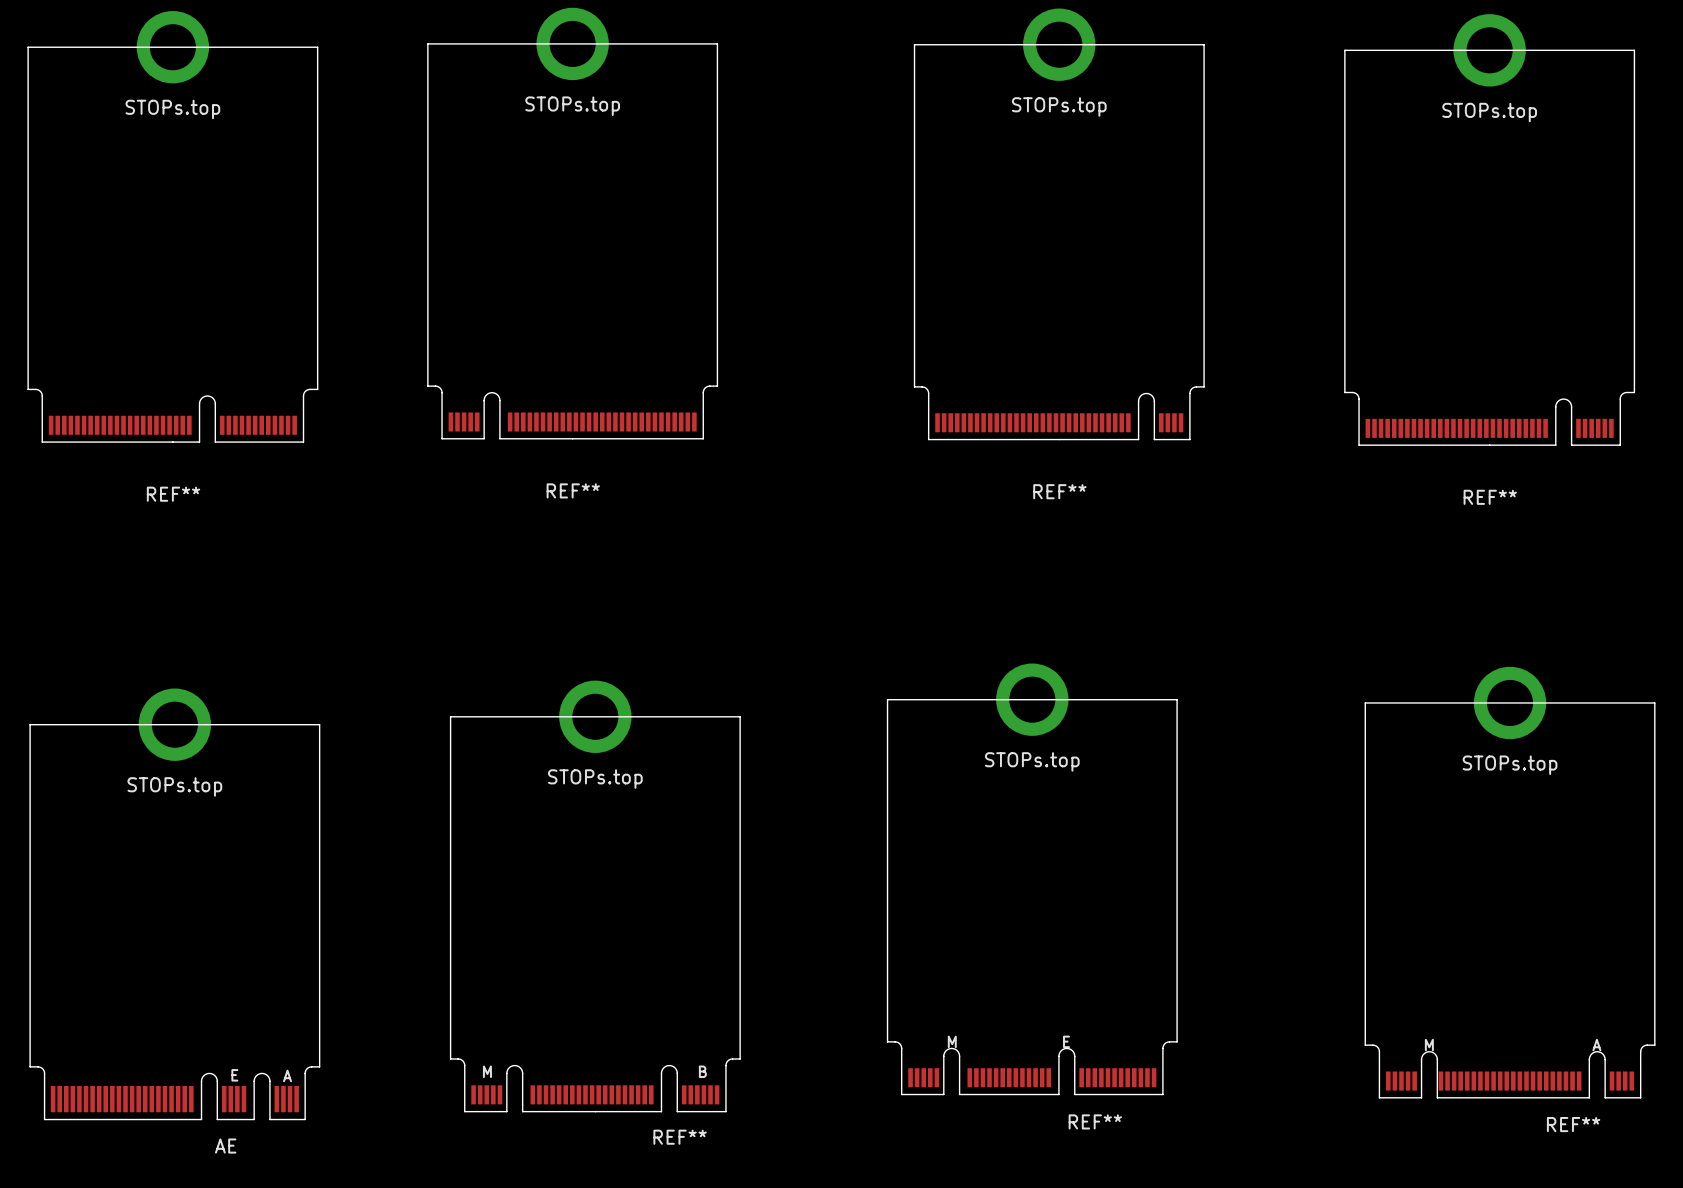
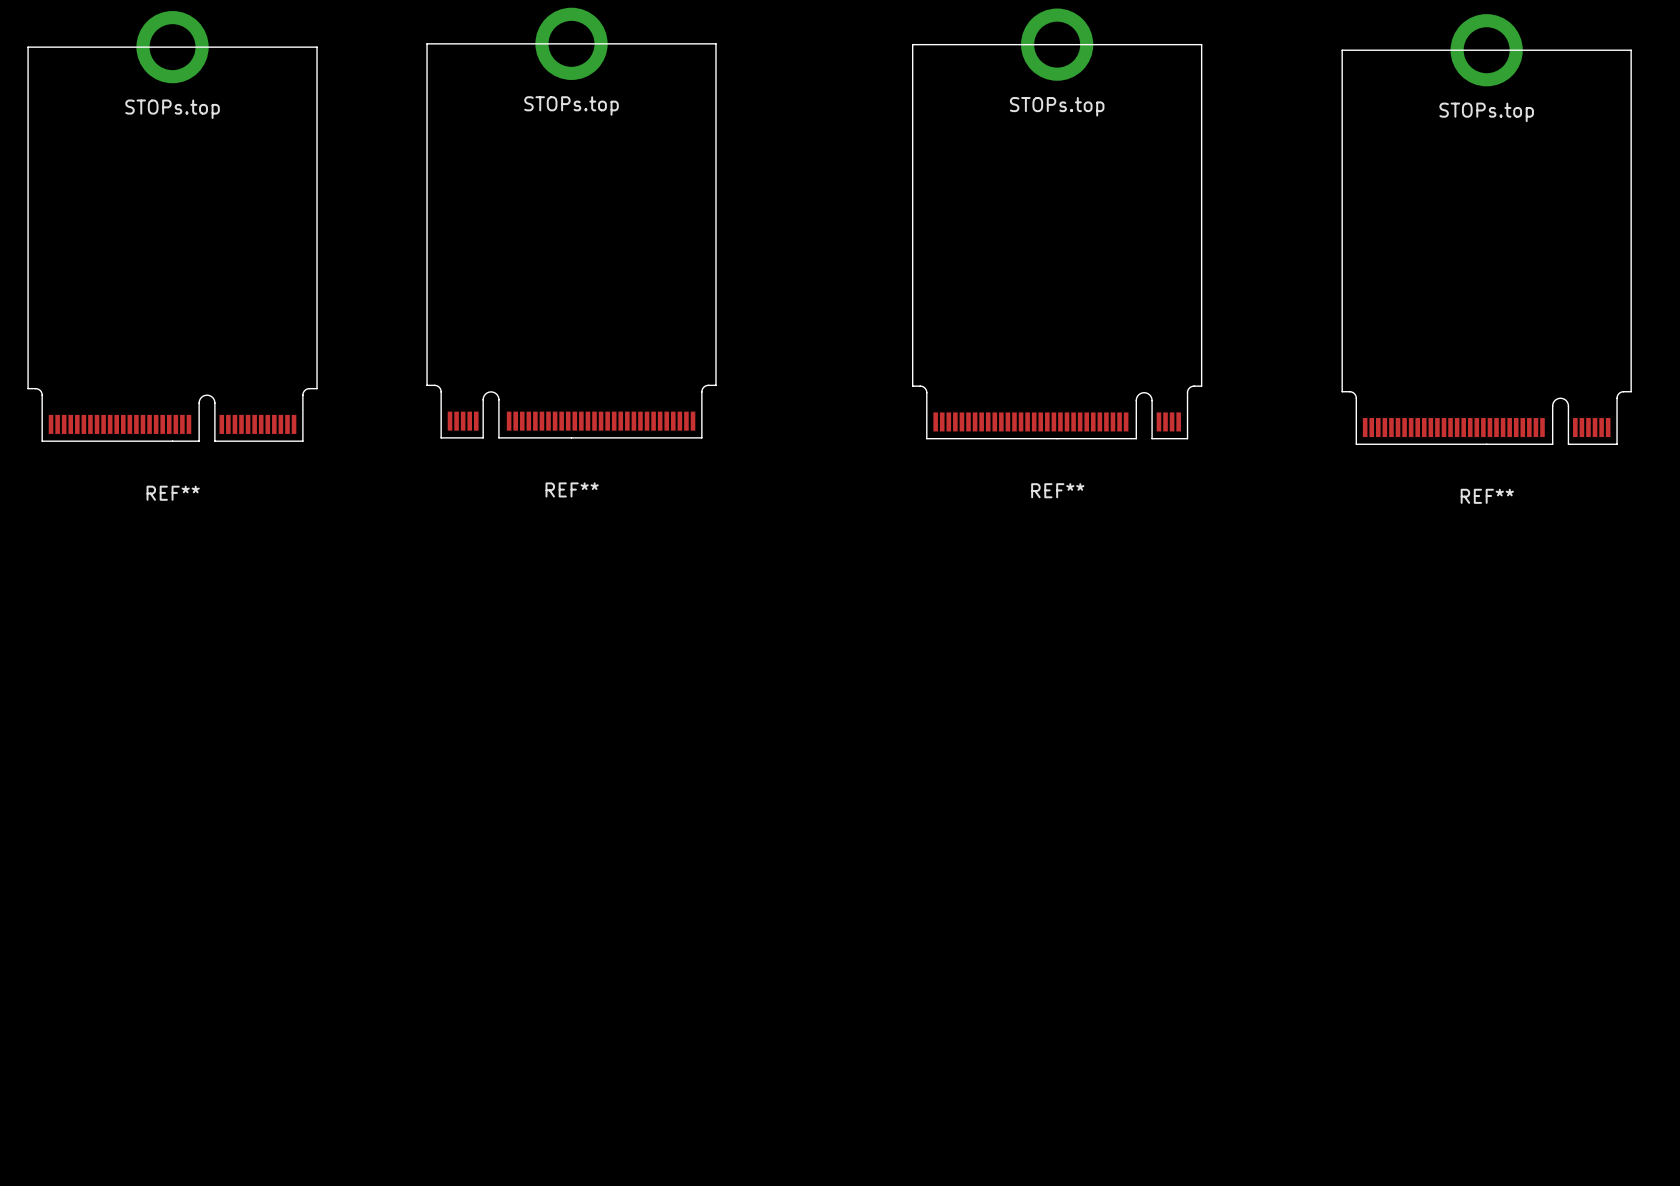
STOPs.top: (1032, 699) -> none
STOPs.top: (1510, 702) -> none
STOPs.top: (595, 716) -> none
STOPs.top: (174, 724) -> none
board edge: (887, 1041) (887, 699) (1177, 699) (1177, 1041) -> none
board edge: (1365, 1045) (1365, 702) (1654, 702) (1654, 1045) -> none
board edge: (450, 1058) (450, 716) (740, 716) (740, 1058) -> none
board edge: (30, 1066) (30, 724) (319, 724) (319, 1066) -> none
REF**: (1032, 1068) -> none
REF**: (1510, 1071) -> none
REF**: (595, 1085) -> none
AE: (174, 1093) -> none

